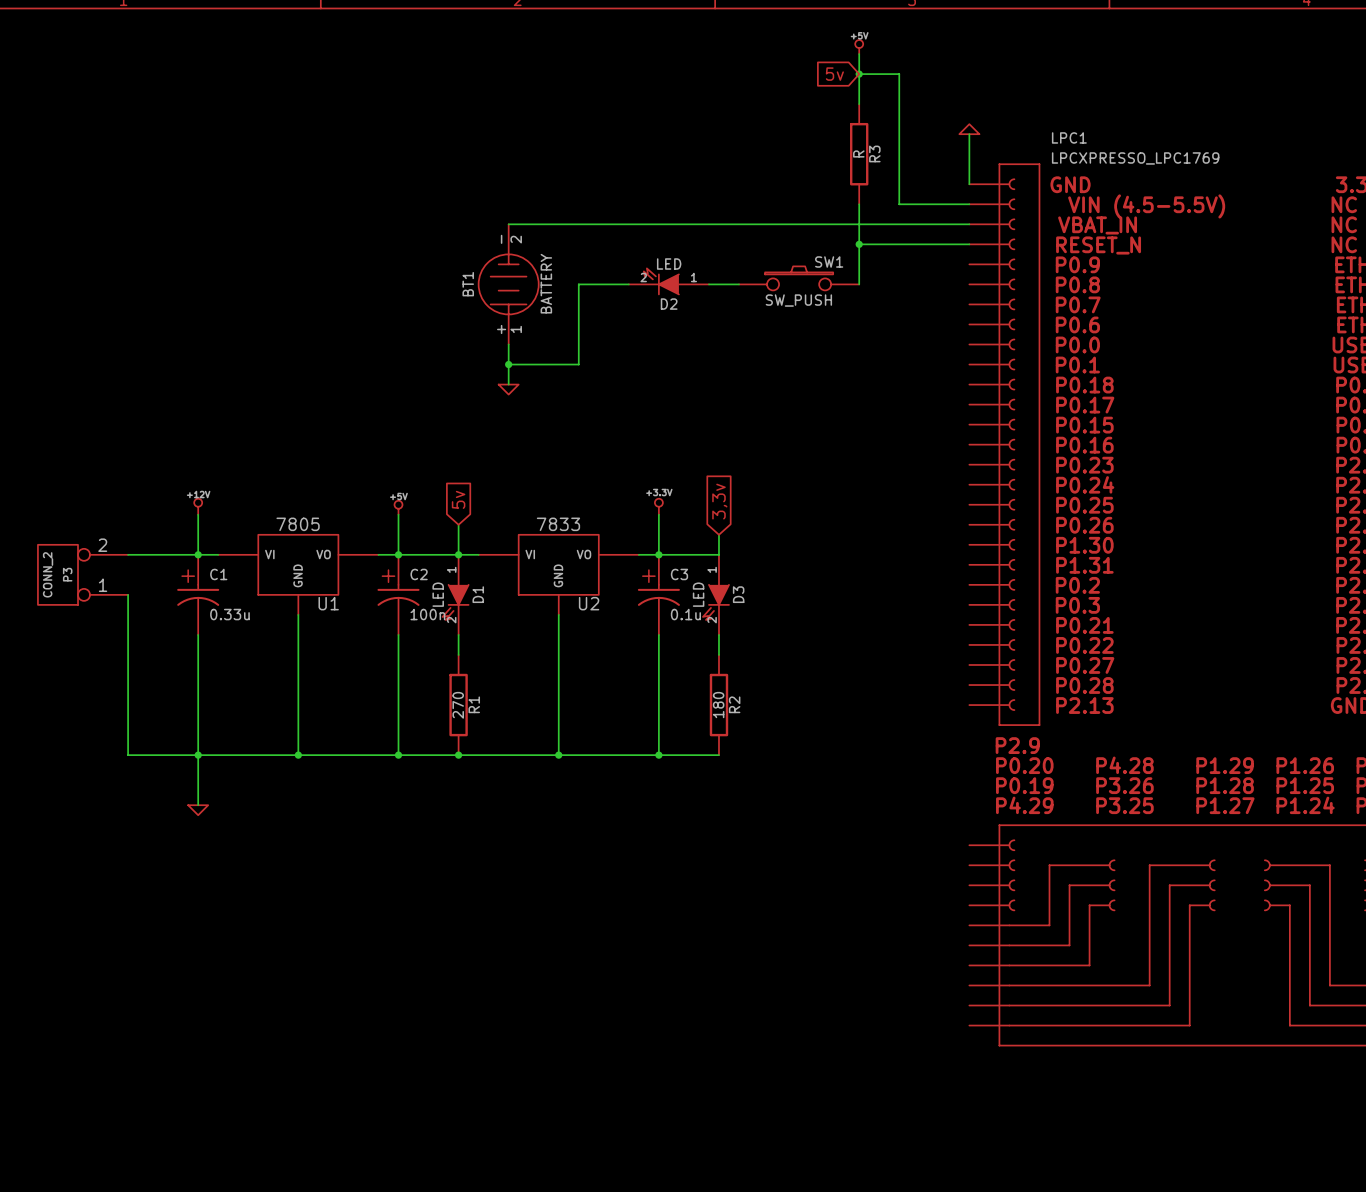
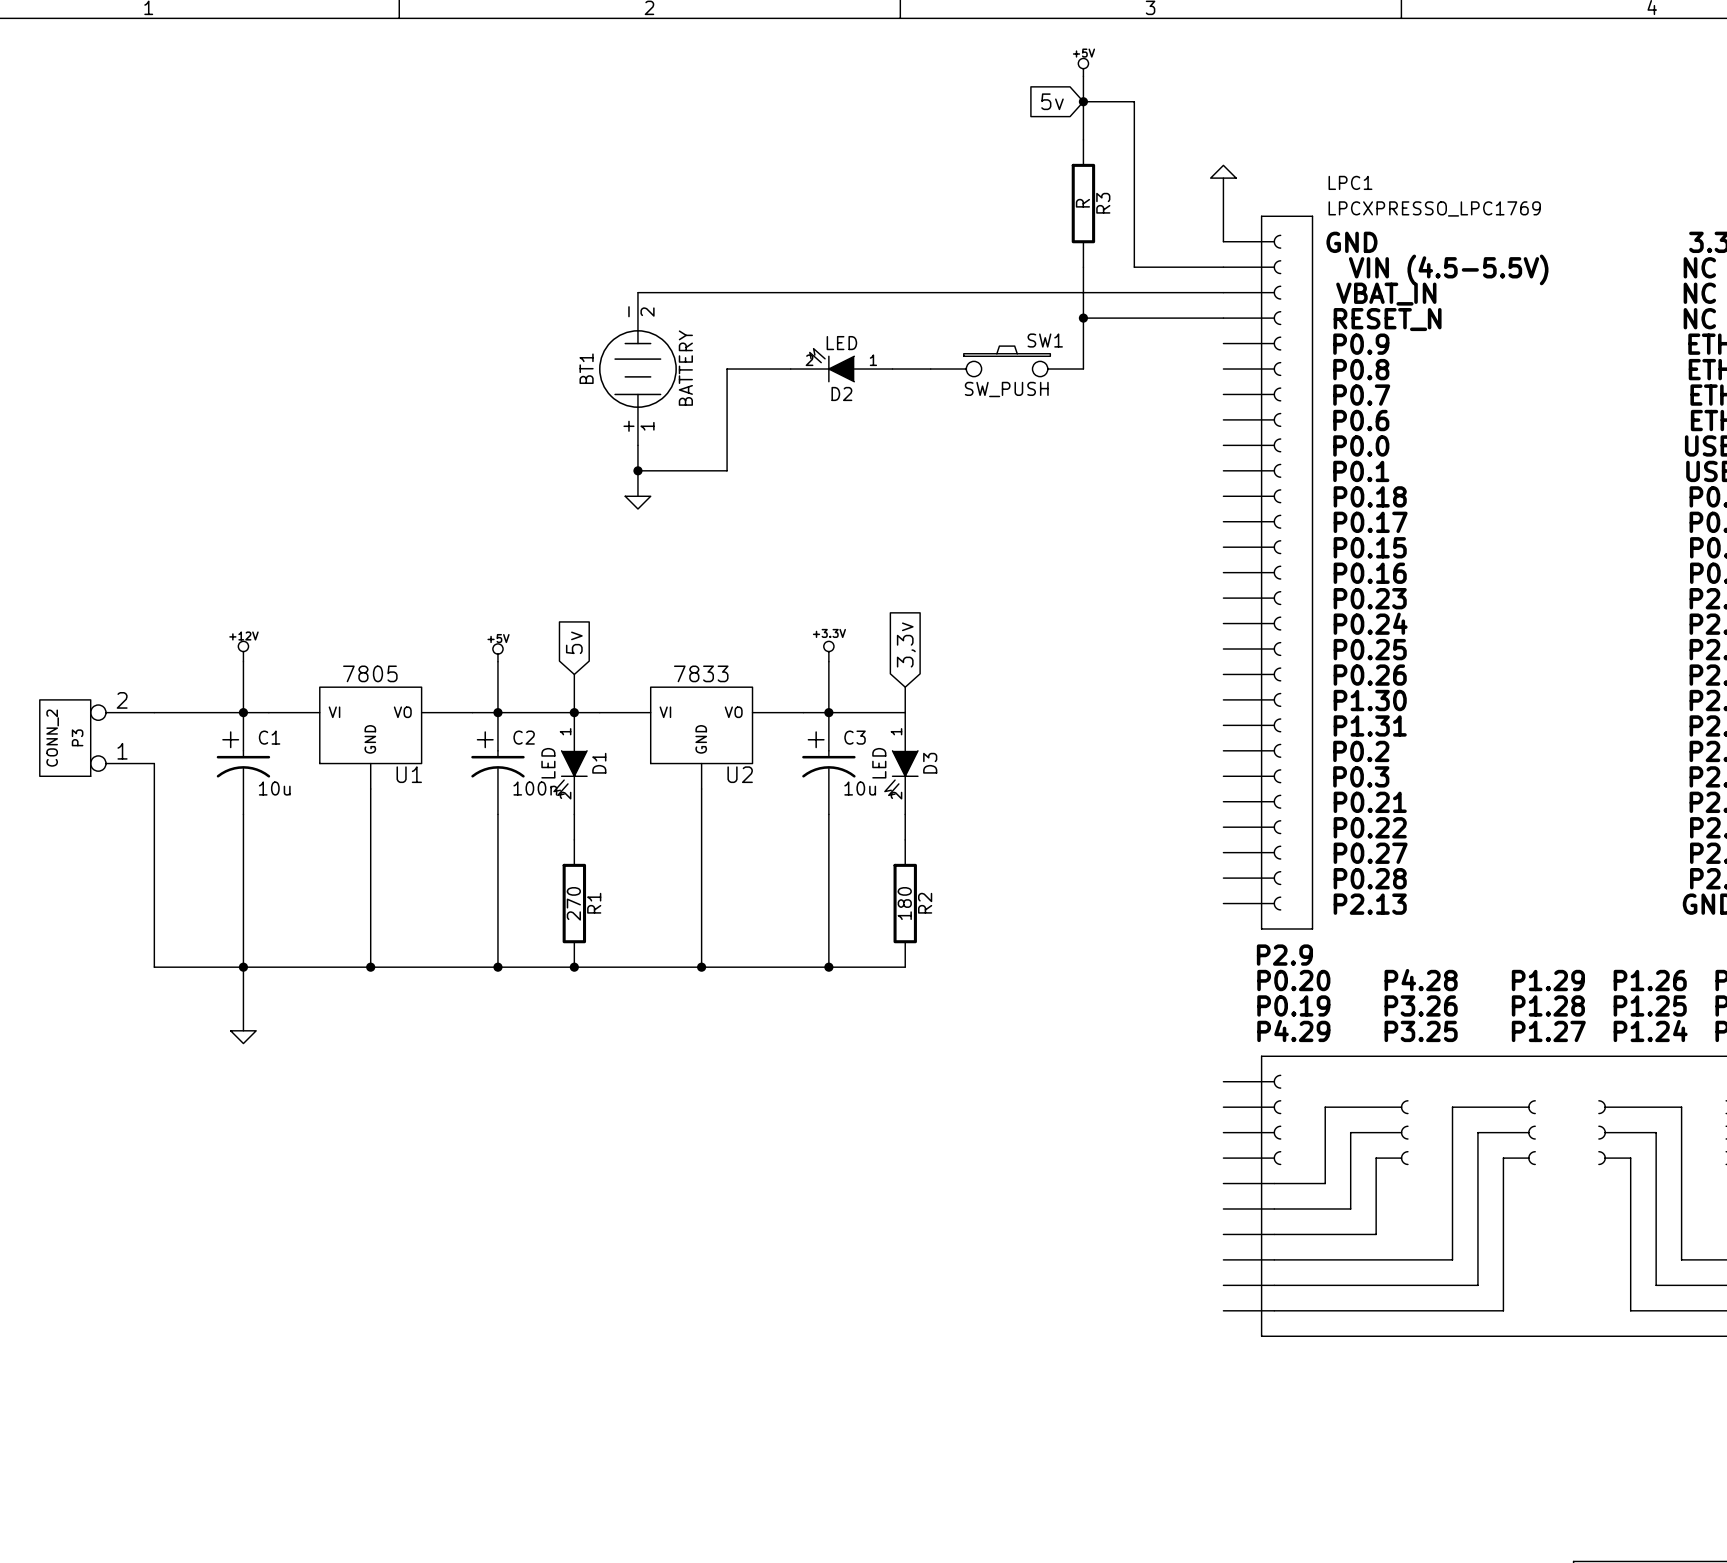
C1 value: 0.33u (229, 614) -> 10u (274, 788)
C3 value: 0.1u (685, 614) -> 10u (860, 788)

